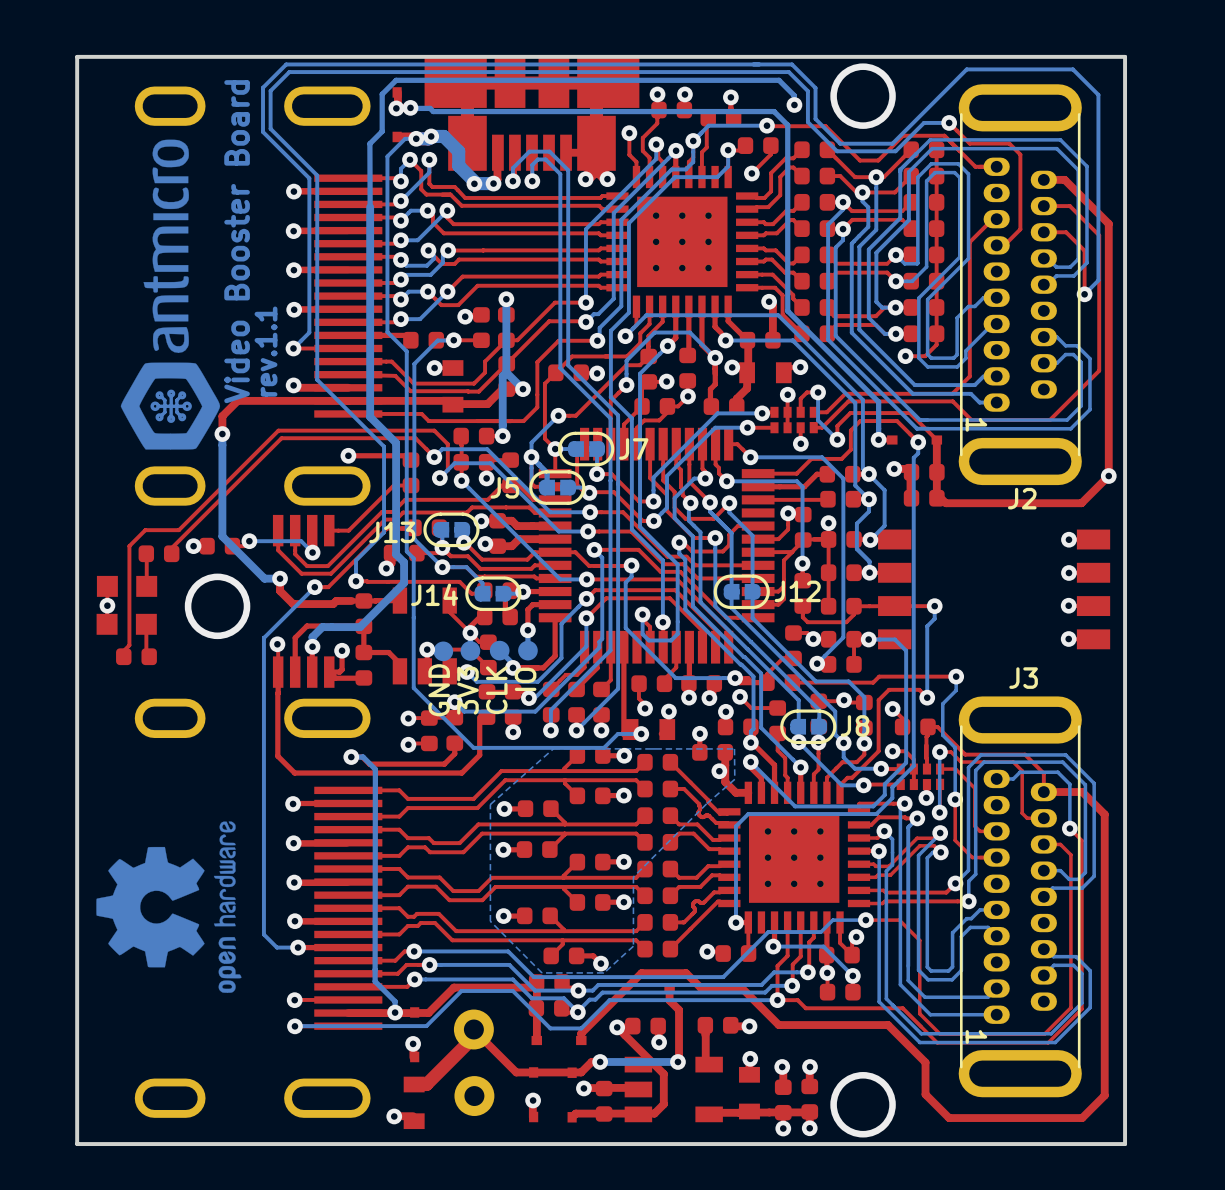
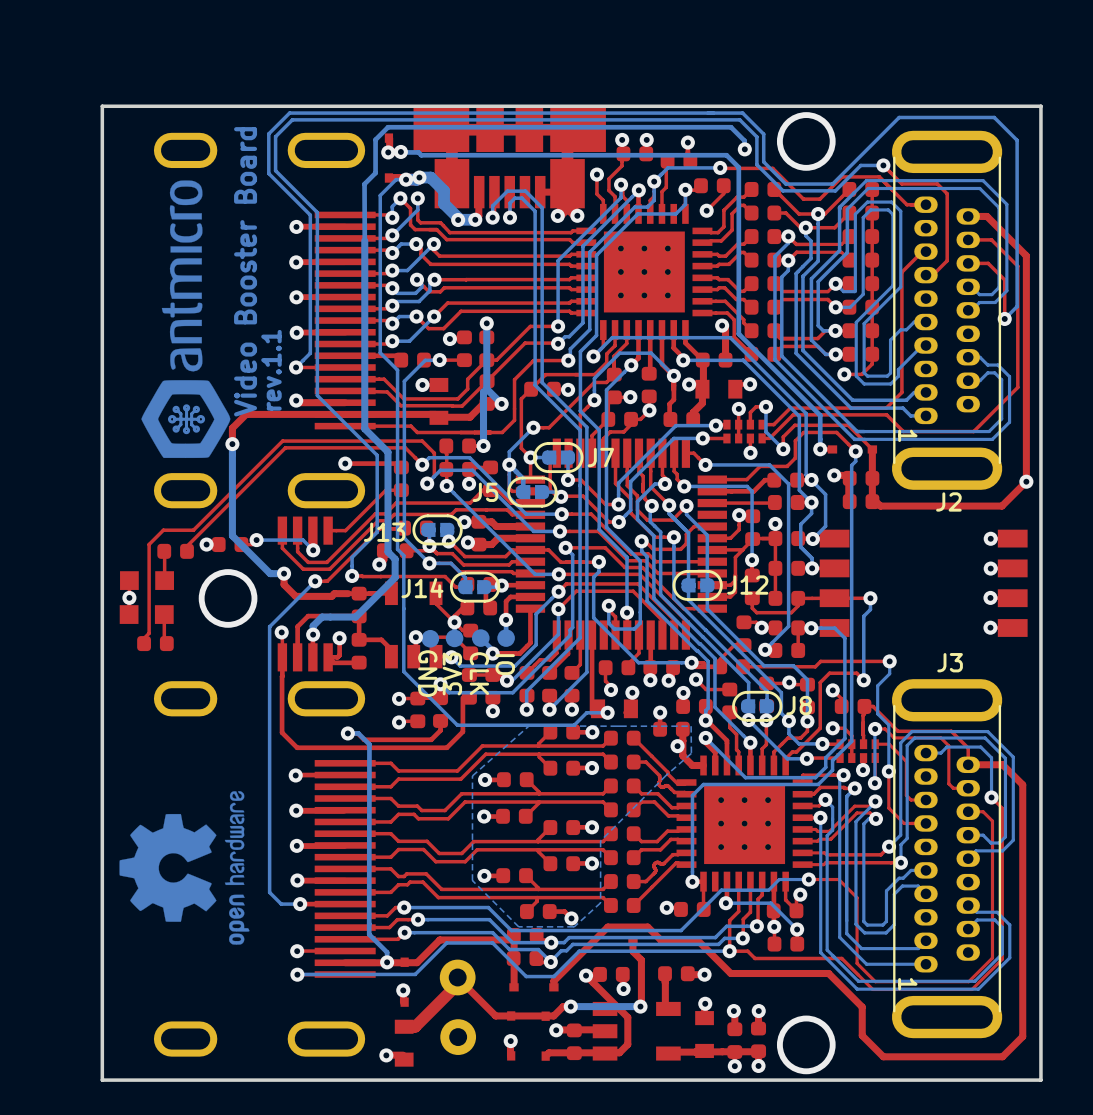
IO name rotation: 0° (525, 679) -> 180° (505, 664)
GND name rotation: 0° (439, 690) -> 180° (427, 673)
CLK name rotation: 0° (496, 690) -> 180° (479, 673)

